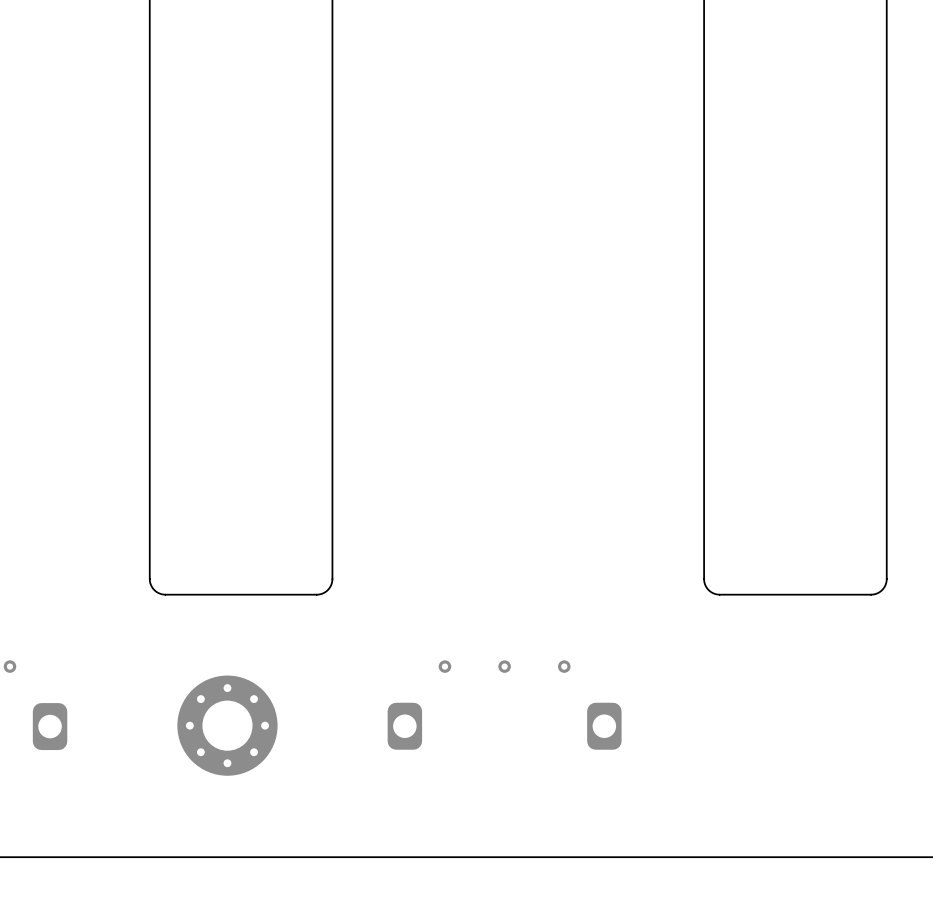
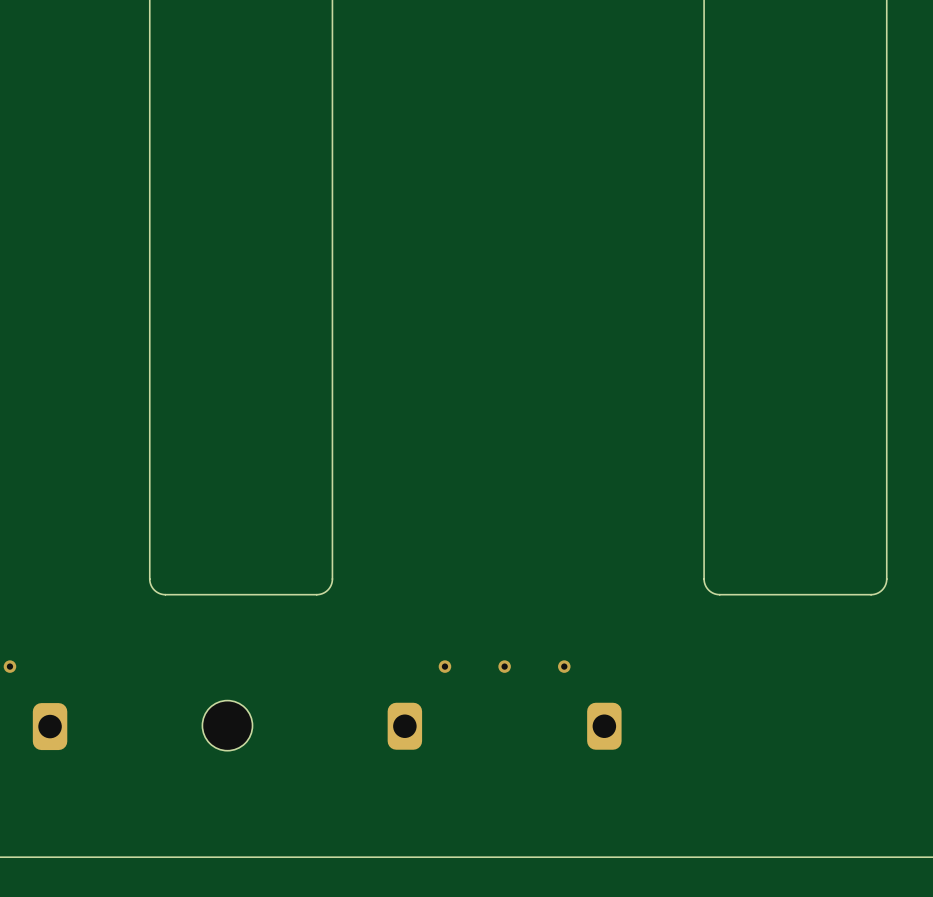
part footprint: [177, 675, 278, 776] -> [202, 700, 253, 751]

